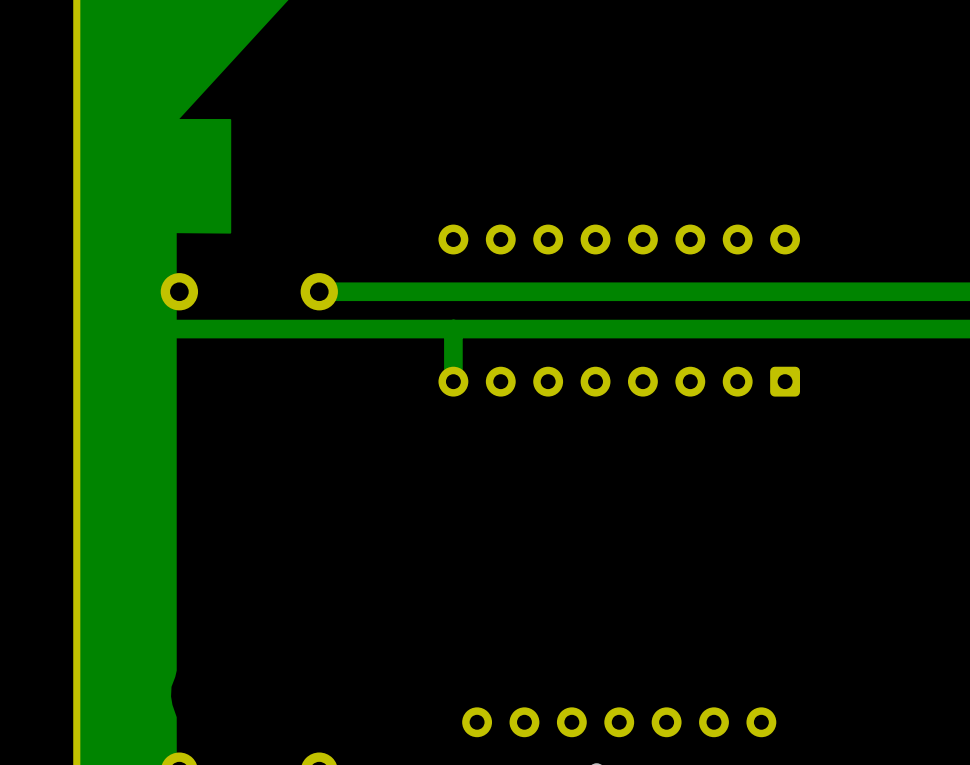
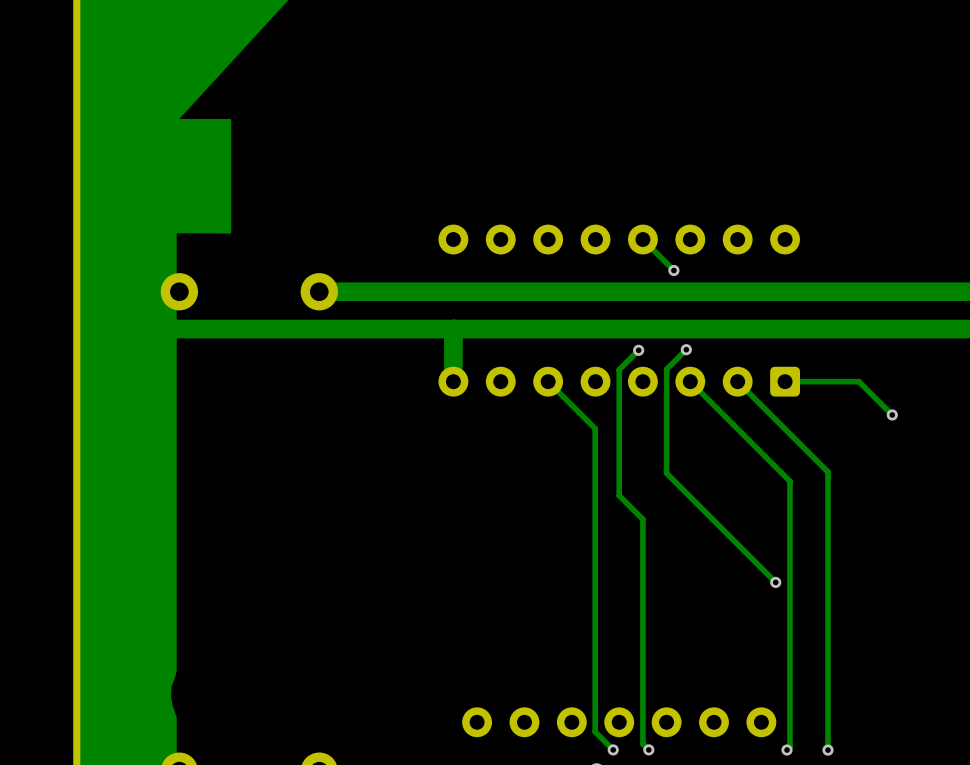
track: none -> (642, 239) (673, 270)
via: none -> (673, 270)
track: none -> (686, 349) (666, 369) (666, 473) (775, 582)
via: none -> (686, 349)
track: none -> (638, 350) (619, 369) (619, 495) (642, 519) (642, 744) (648, 749)
via: none -> (638, 350)
track: none -> (548, 381) (595, 428) (595, 731) (613, 749)
track: none -> (690, 381) (789, 481) (789, 747) (787, 750)
track: none -> (737, 381) (828, 471) (828, 750)
track: none -> (785, 381) (858, 381) (892, 414)
via: none -> (892, 414)
via: none -> (775, 582)
via: none -> (613, 749)
via: none -> (648, 749)
via: none -> (787, 750)
via: none -> (828, 750)

